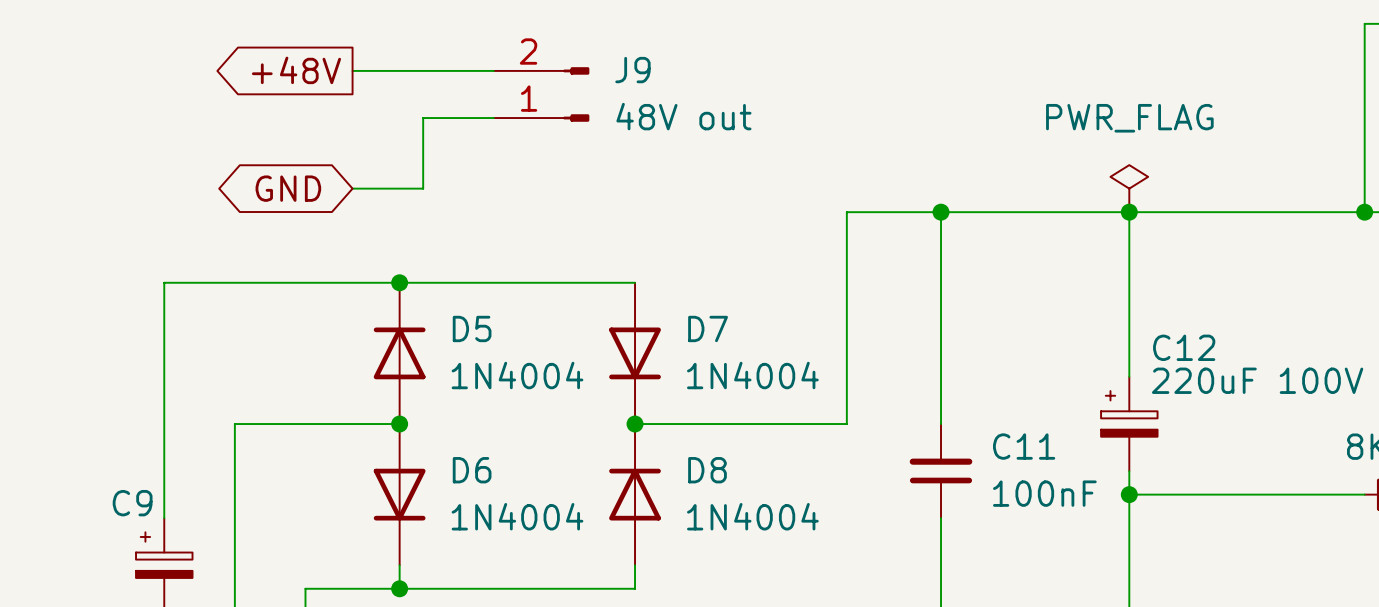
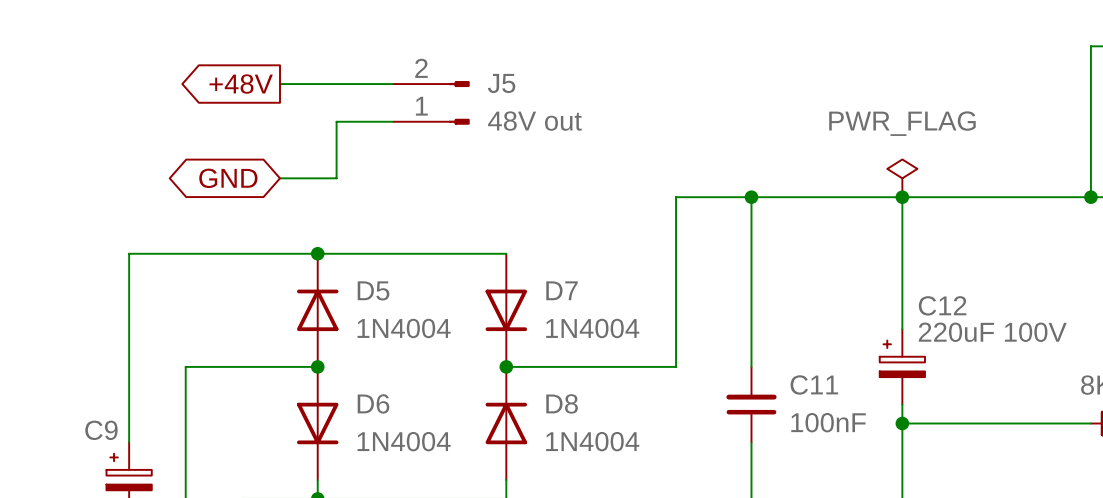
J9 name: J9 (632, 70) -> J5 (501, 83)

